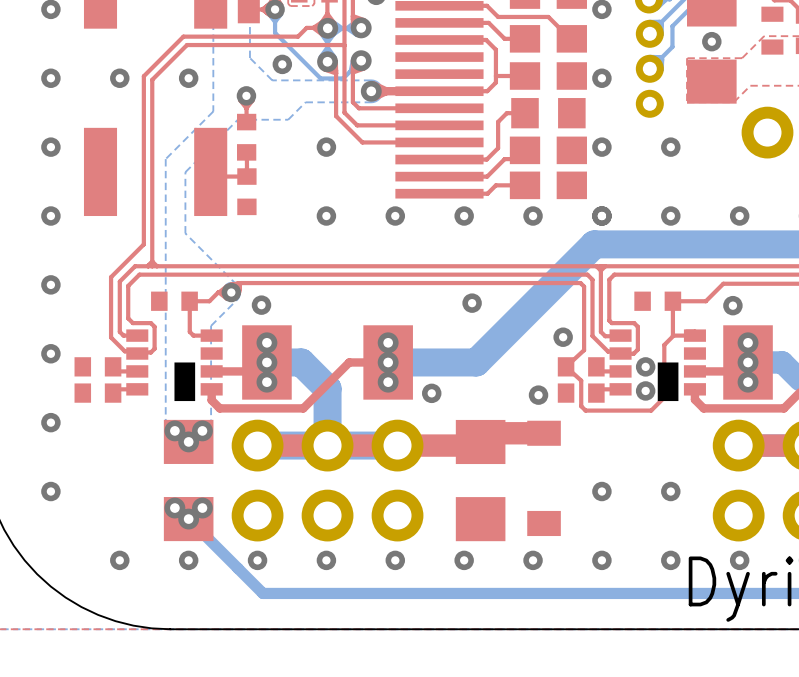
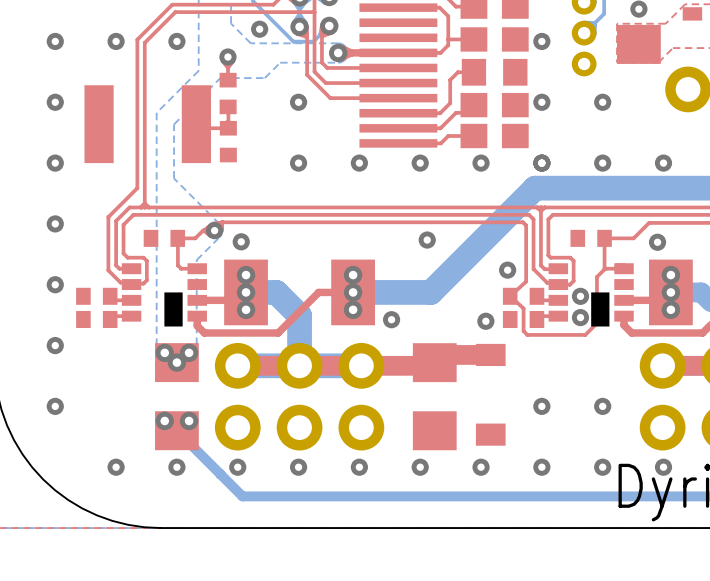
via: (188, 519) -> none

